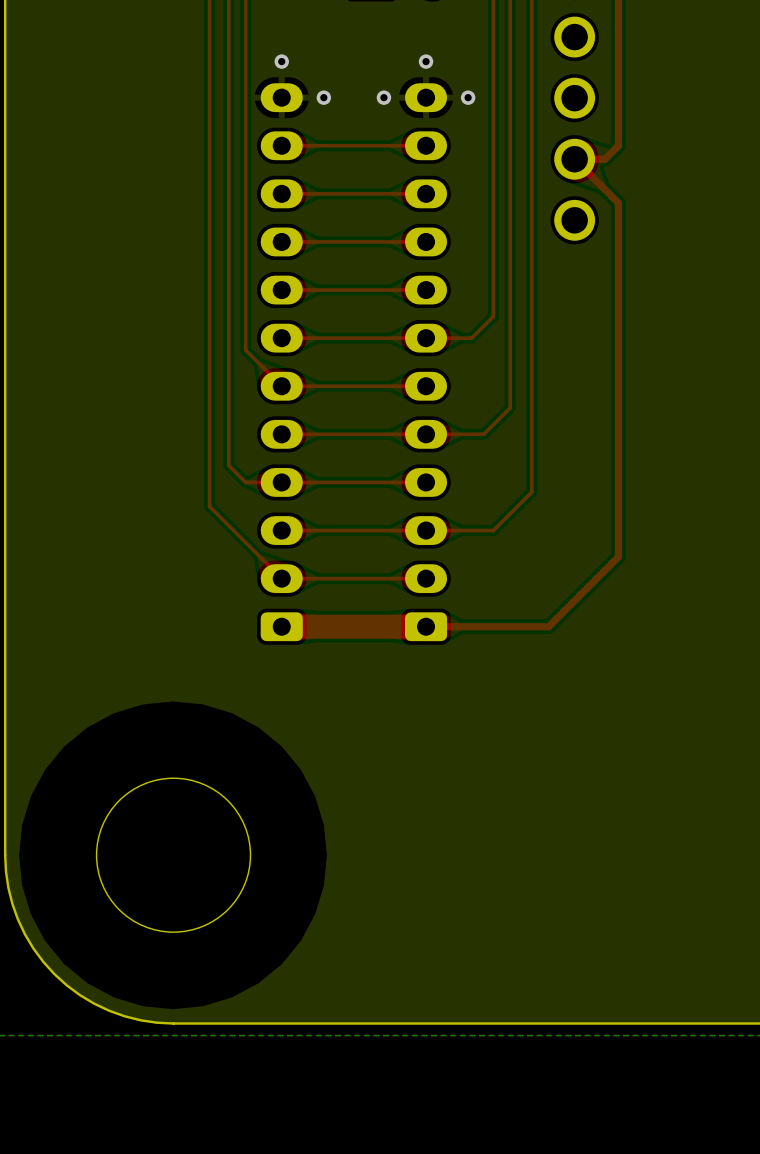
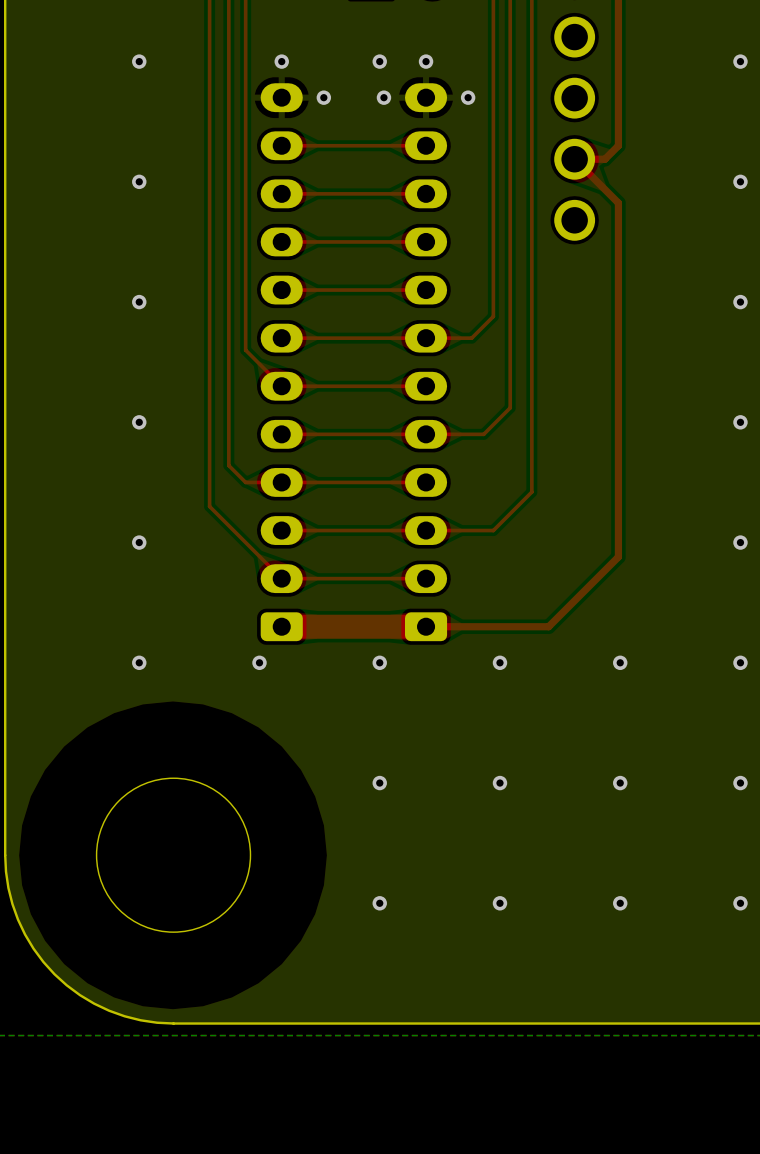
via: none -> (139, 61)
via: none -> (379, 61)
via: none -> (740, 61)
via: none -> (139, 181)
via: none -> (740, 181)
via: none -> (139, 302)
via: none -> (740, 302)
via: none -> (139, 422)
via: none -> (740, 422)
via: none -> (139, 542)
via: none -> (740, 542)
via: none -> (139, 662)
via: none -> (259, 662)
via: none -> (379, 662)
via: none -> (499, 662)
via: none -> (620, 662)
via: none -> (740, 662)
via: none -> (379, 783)
via: none -> (499, 783)
via: none -> (620, 783)
via: none -> (740, 783)
via: none -> (379, 903)
via: none -> (499, 903)
via: none -> (620, 903)
via: none -> (740, 903)

